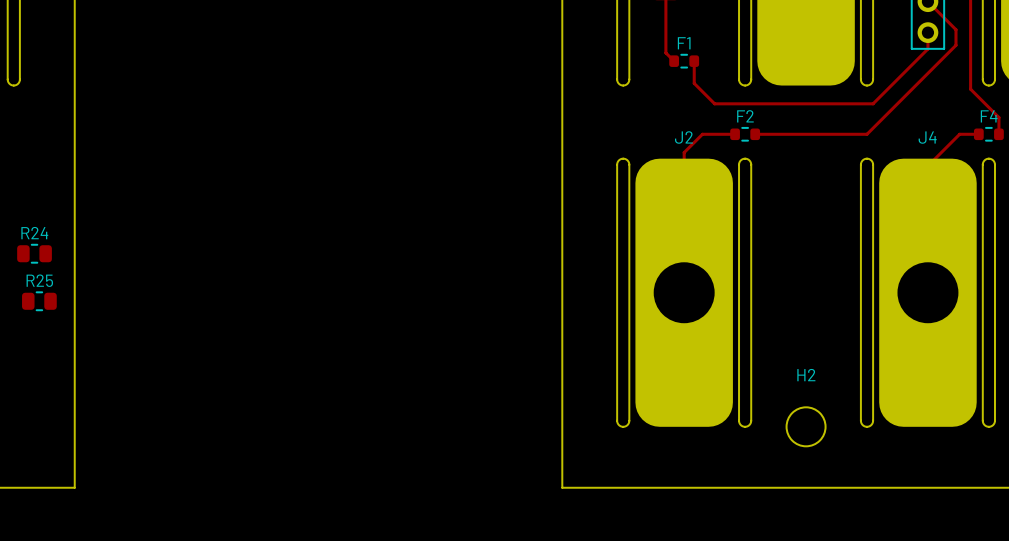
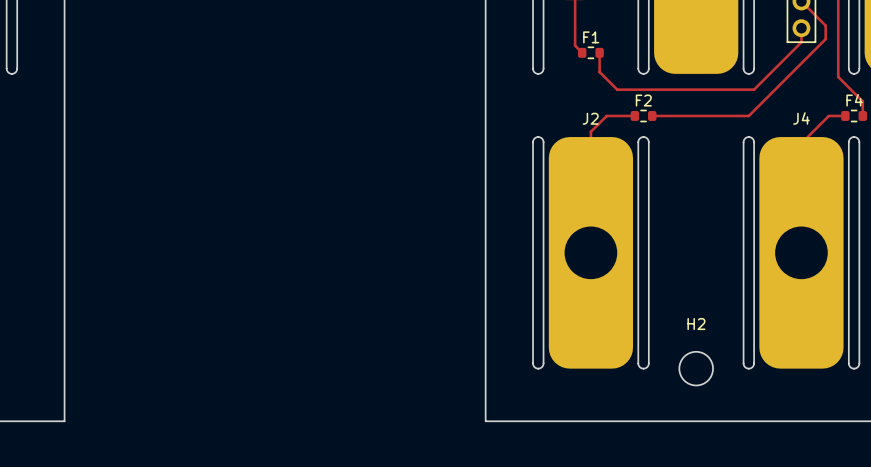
R24: (34, 253) -> none
R25: (39, 301) -> none

